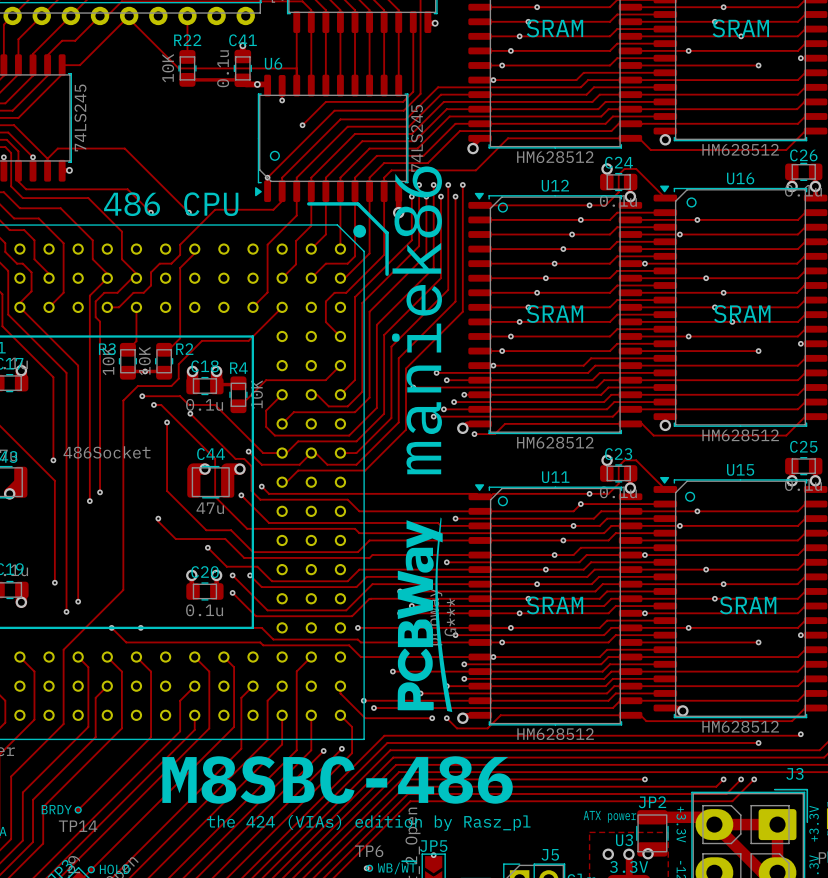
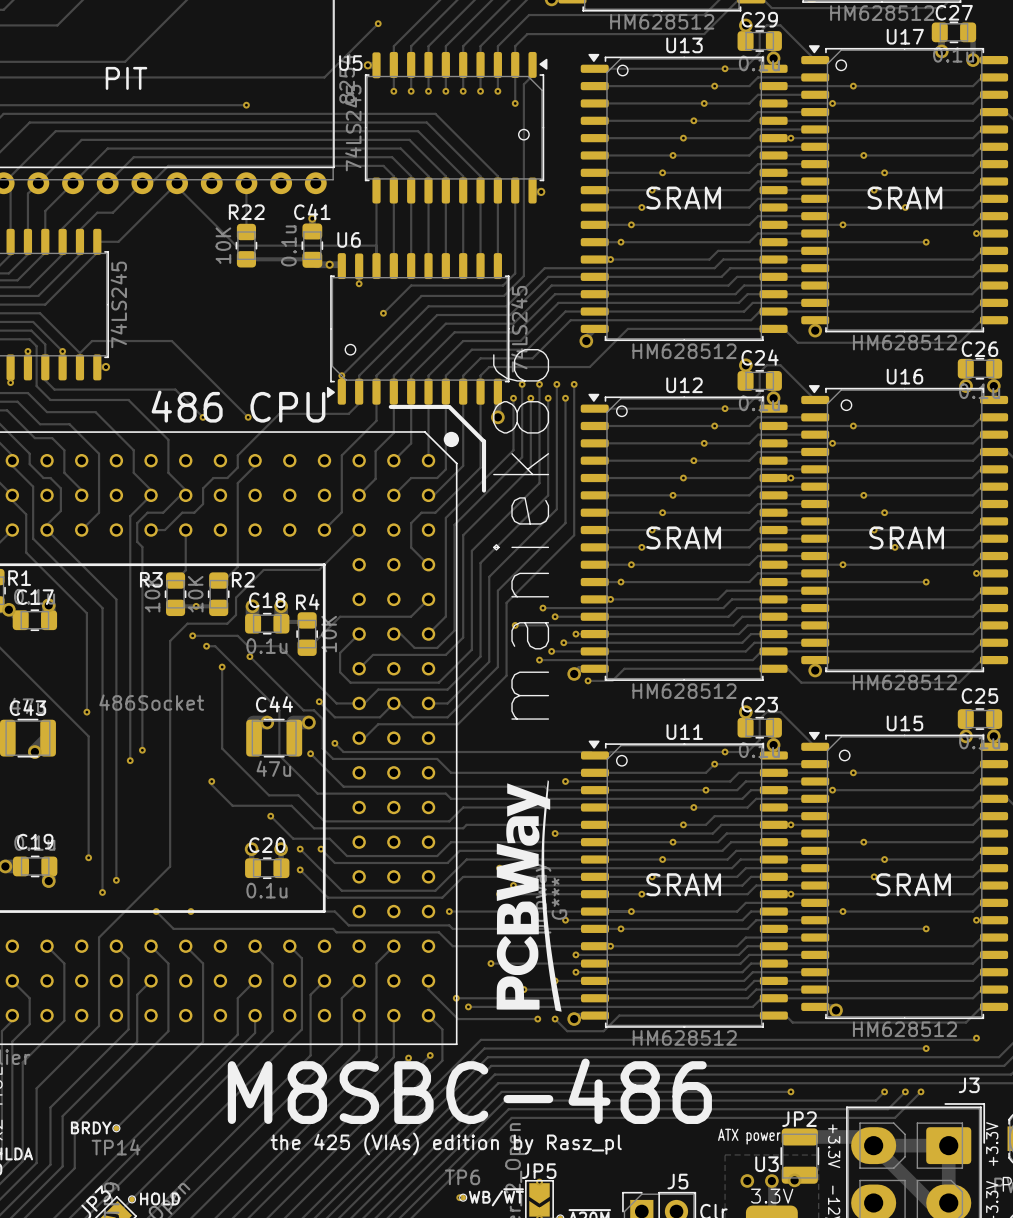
text: the 424 (VIAs) edition by Rasz_pl (368, 822) -> the 425 (VIAs) edition by Rasz_pl (446, 1143)

